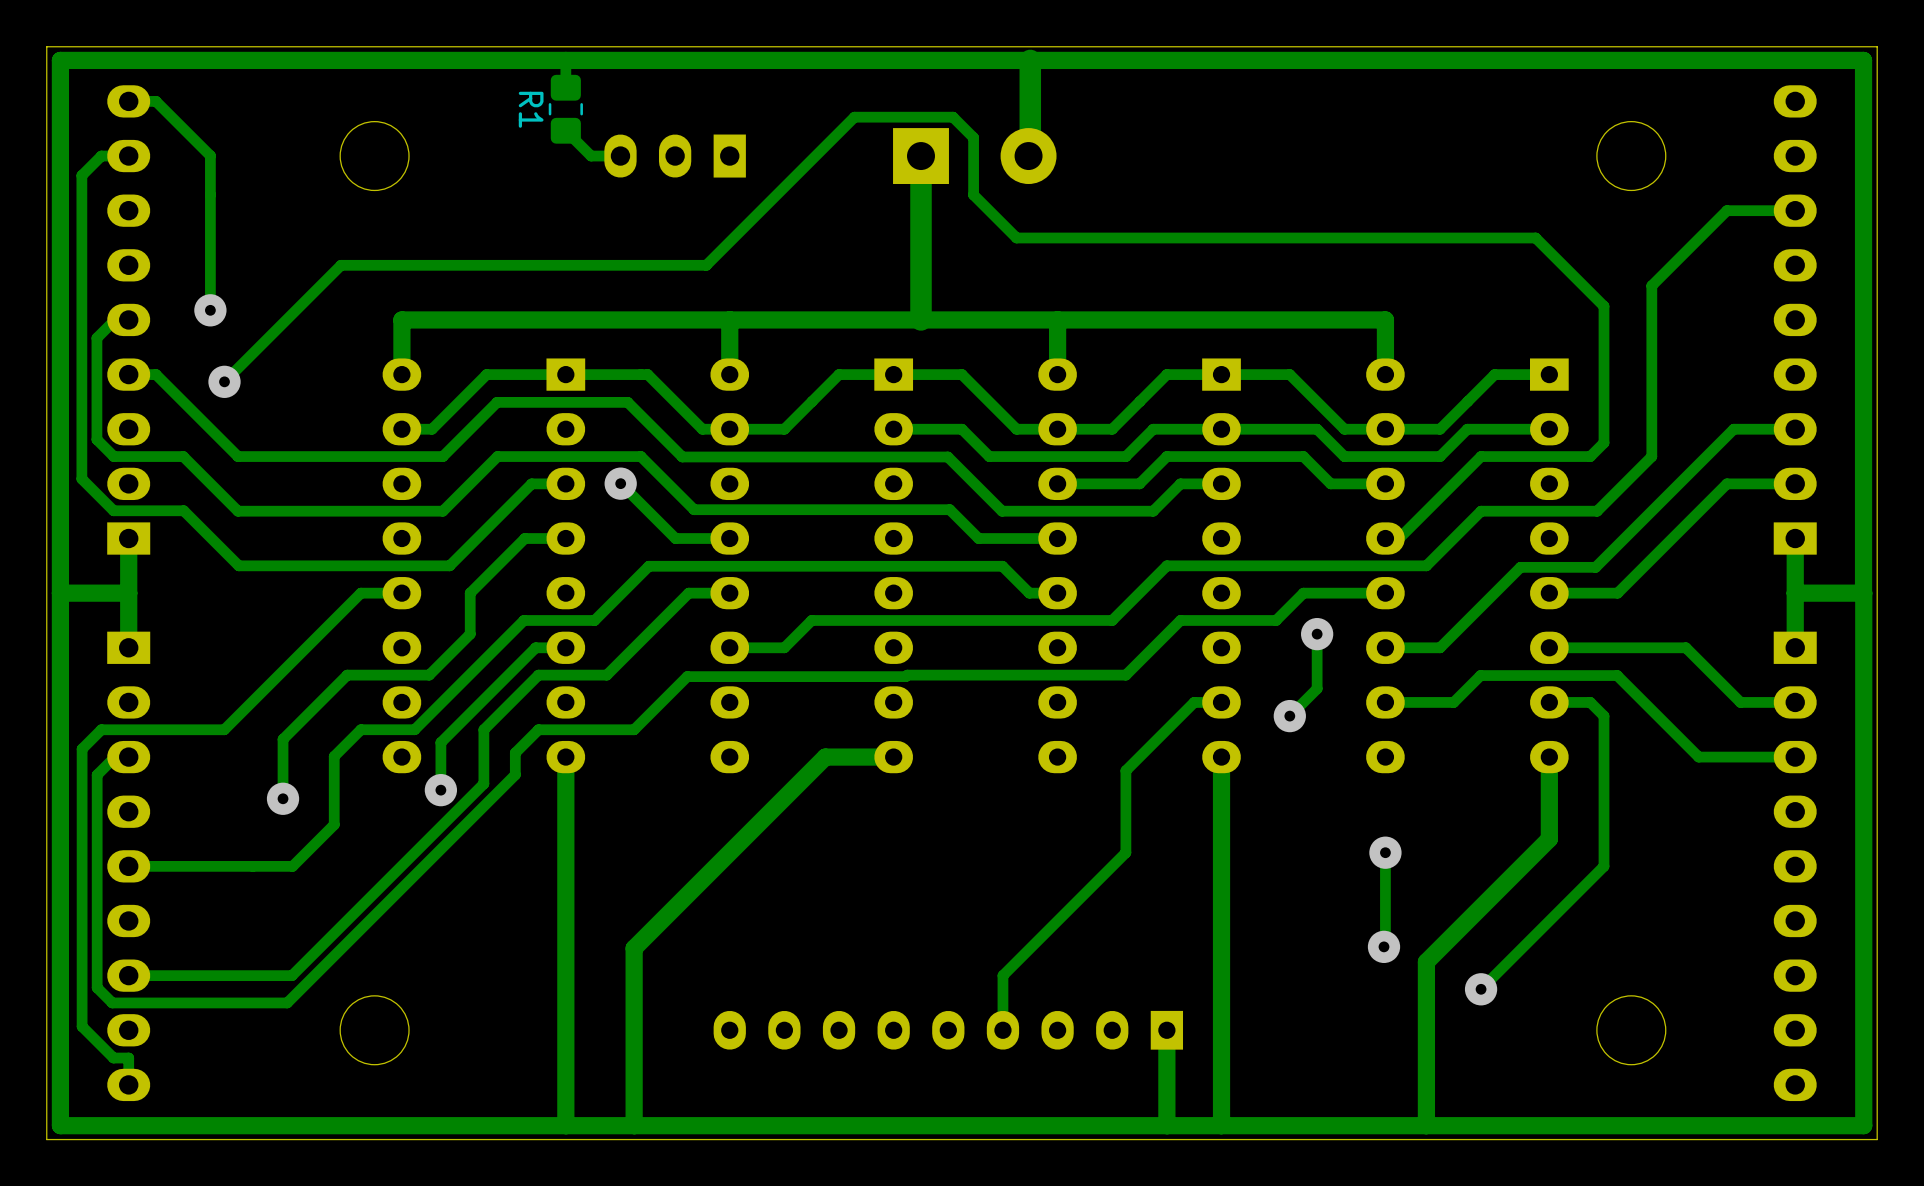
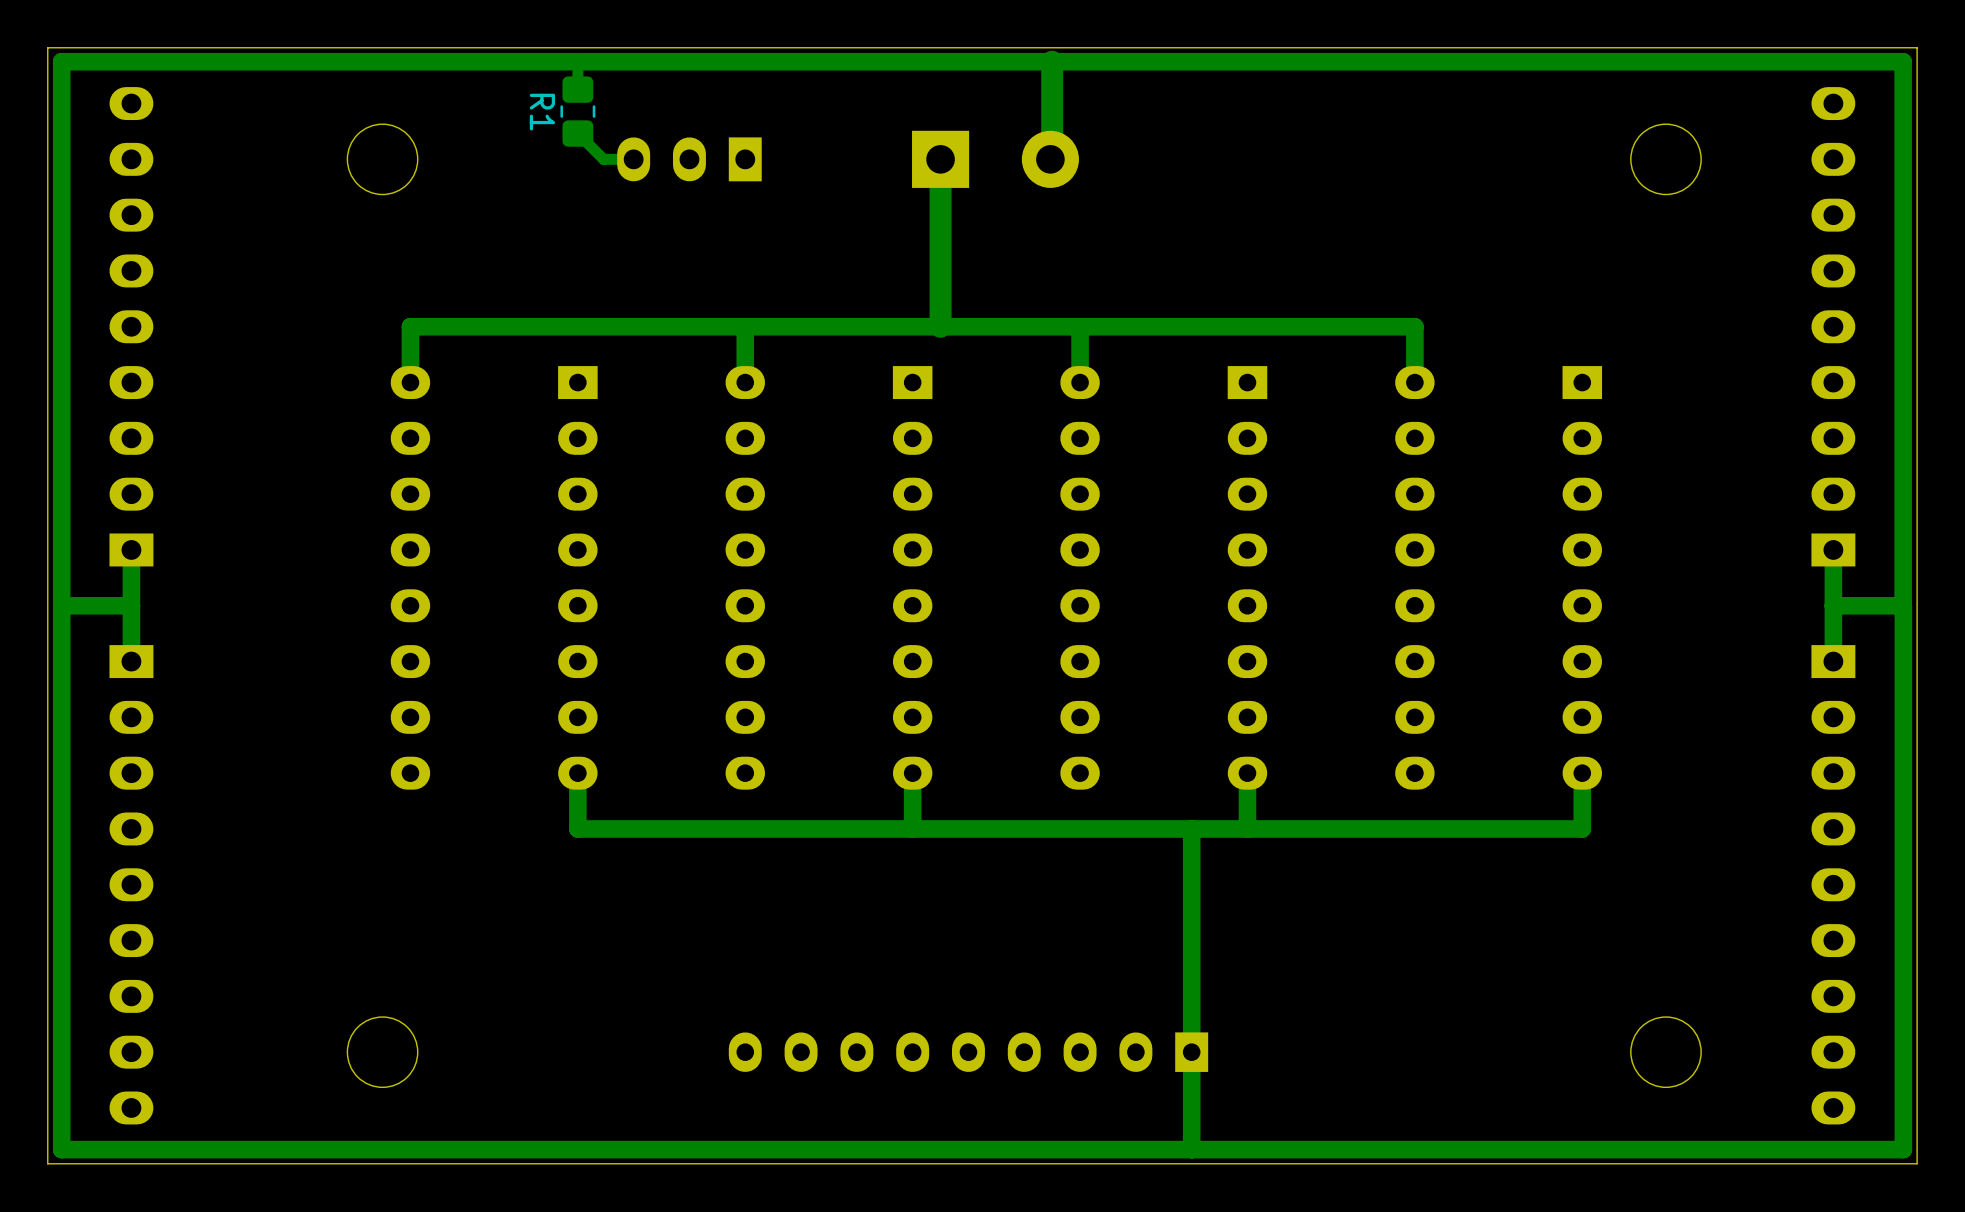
track: (128, 101) (156, 101) (210, 155) (210, 310) -> none
track: (128, 156) (101, 156) (81, 175) (81, 478) (113, 510) (183, 510) (238, 565) (449, 565) (531, 483) (565, 483) -> none
track: (1795, 210) (1726, 210) (1651, 285) (1651, 456) (1597, 511) (1481, 511) (1426, 565) (1166, 565) (1112, 620) (811, 620) (784, 647) (729, 647) -> none
via: (210, 310) -> none
track: (128, 319) (115, 319) (96, 338) (96, 439) (113, 456) (183, 456) (238, 511) (442, 511) (497, 456) (640, 456) (694, 509) (949, 509) (978, 538) (1057, 538) -> none
track: (128, 374) (156, 374) (238, 456) (442, 456) (497, 402) (627, 402) (682, 456) (947, 456) (1002, 511) (1153, 511) (1180, 483) (1221, 483) -> none
track: (1549, 374) (1494, 374) (1440, 429) (1344, 429) (1289, 374) (1166, 374) (1112, 429) (1016, 429) (961, 374) (839, 374) (784, 429) (702, 429) (647, 374) (486, 374) (432, 429) (401, 429) -> none
track: (224, 381) (341, 265) (706, 265) (854, 117) (953, 117) (973, 137) (973, 194) (1016, 238) (1535, 238) (1604, 306) (1604, 442) (1590, 456) (1481, 456) (1399, 538) (1385, 538) -> none
via: (224, 381) -> none
track: (1549, 429) (1467, 429) (1440, 456) (1344, 456) (1317, 429) (1153, 429) (1125, 456) (989, 456) (961, 429) (893, 429) -> none
track: (1795, 429) (1733, 429) (1595, 567) (1520, 567) (1440, 647) (1385, 647) -> none
track: (620, 483) (675, 538) (729, 538) -> none
via: (620, 483) -> none
track: (1385, 483) (1330, 483) (1303, 456) (1166, 456) (1139, 483) (1057, 483) -> none
track: (1795, 483) (1726, 483) (1617, 593) (1549, 593) -> none
track: (565, 538) (524, 538) (470, 593) (470, 634) (429, 675) (347, 675) (283, 739) (283, 798) -> none
track: (401, 593) (360, 593) (224, 729) (101, 729) (82, 749) (82, 1026) (113, 1058) (128, 1058) (128, 1084) -> none
track: (729, 593) (688, 593) (606, 675) (538, 675) (483, 729) (483, 783) (292, 975) (128, 975) -> none
track: (1057, 593) (1029, 593) (1002, 566) (648, 566) (594, 620) (523, 620) (414, 729) (360, 729) (334, 756) (334, 824) (292, 866) (128, 866) -> none
track: (1385, 593) (1303, 593) (1276, 620) (1180, 620) (1125, 675) (687, 676) (634, 729) (538, 729) (515, 752) (515, 774) (287, 1002) (112, 1002) (97, 987) (97, 774) (115, 757) (128, 757) -> none
track: (1317, 634) (1317, 688) (1289, 716) -> none
via: (1317, 634) -> none
track: (565, 647) (535, 647) (440, 742) (440, 790) -> none
track: (1549, 647) (1685, 647) (1740, 702) (1795, 702) -> none
track: (1221, 702) (1194, 702) (1125, 770) (1125, 852) (1002, 975) (1002, 1030) -> none
track: (1385, 702) (1453, 702) (1480, 675) (1617, 675) (1698, 757) (1795, 757) -> none
track: (1549, 702) (1590, 702) (1604, 716) (1604, 866) (1481, 989) -> none
via: (1289, 716) -> none
track: (893, 757) (825, 757) (634, 948) (634, 1125) -> (912, 773) (912, 828)
via: (440, 790) -> none
via: (283, 798) -> none
track: (565, 811) (565, 1125) -> none
track: none -> (1191, 828) (1191, 1052)
track: (1221, 811) (1221, 1125) -> none
track: (1549, 811) (1549, 839) (1426, 961) (1426, 1125) -> (1582, 828) (577, 828)
track: (1385, 852) (1384, 946) -> none
via: (1385, 852) -> none
via: (1384, 946) -> none
via: (1481, 989) -> none

